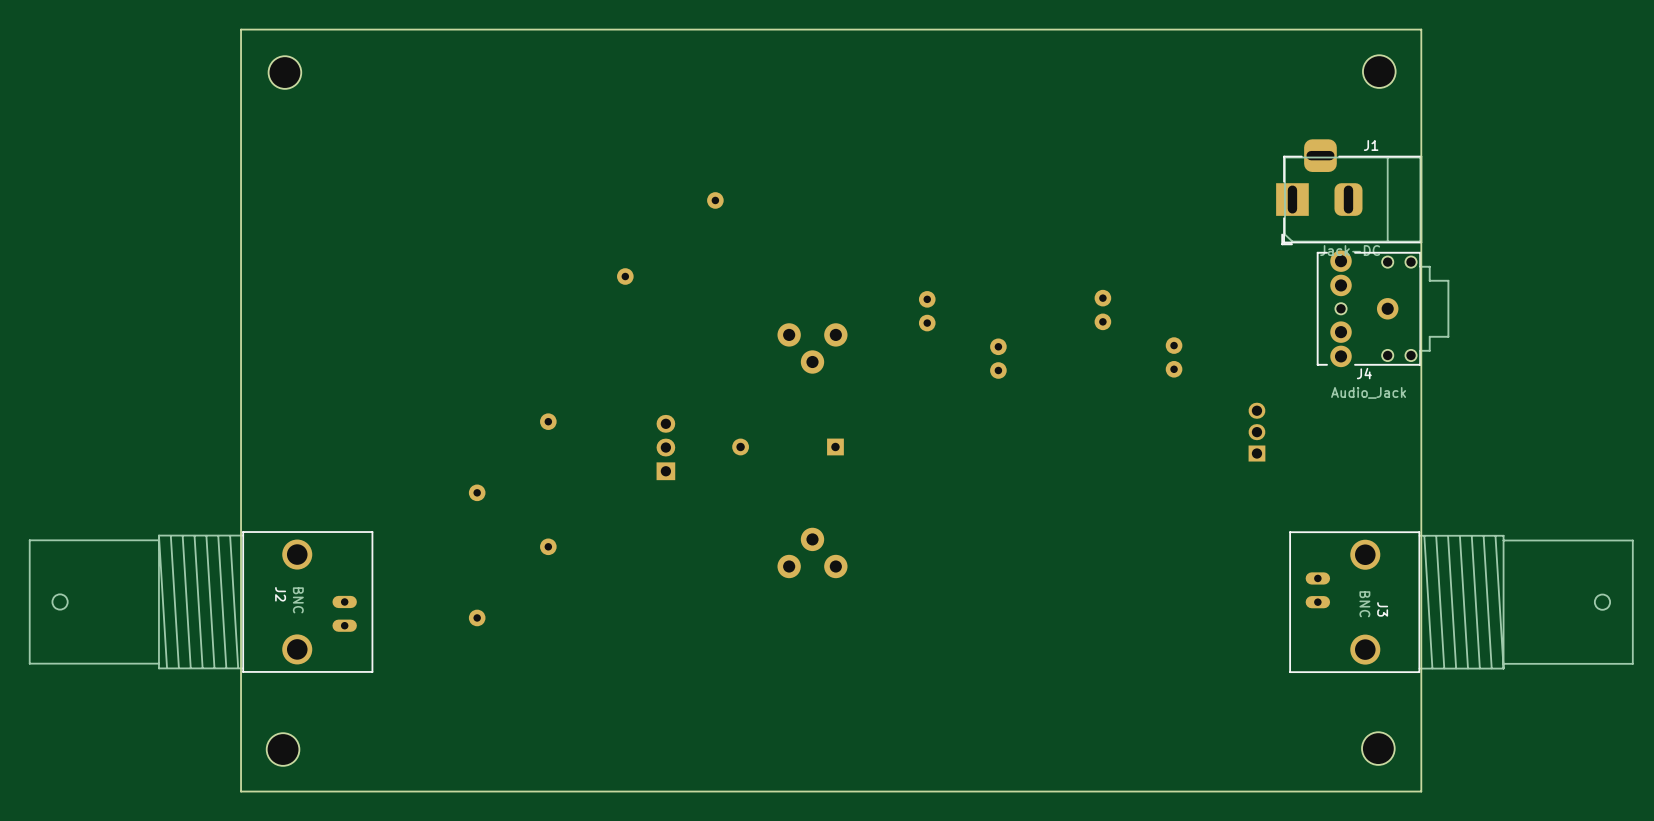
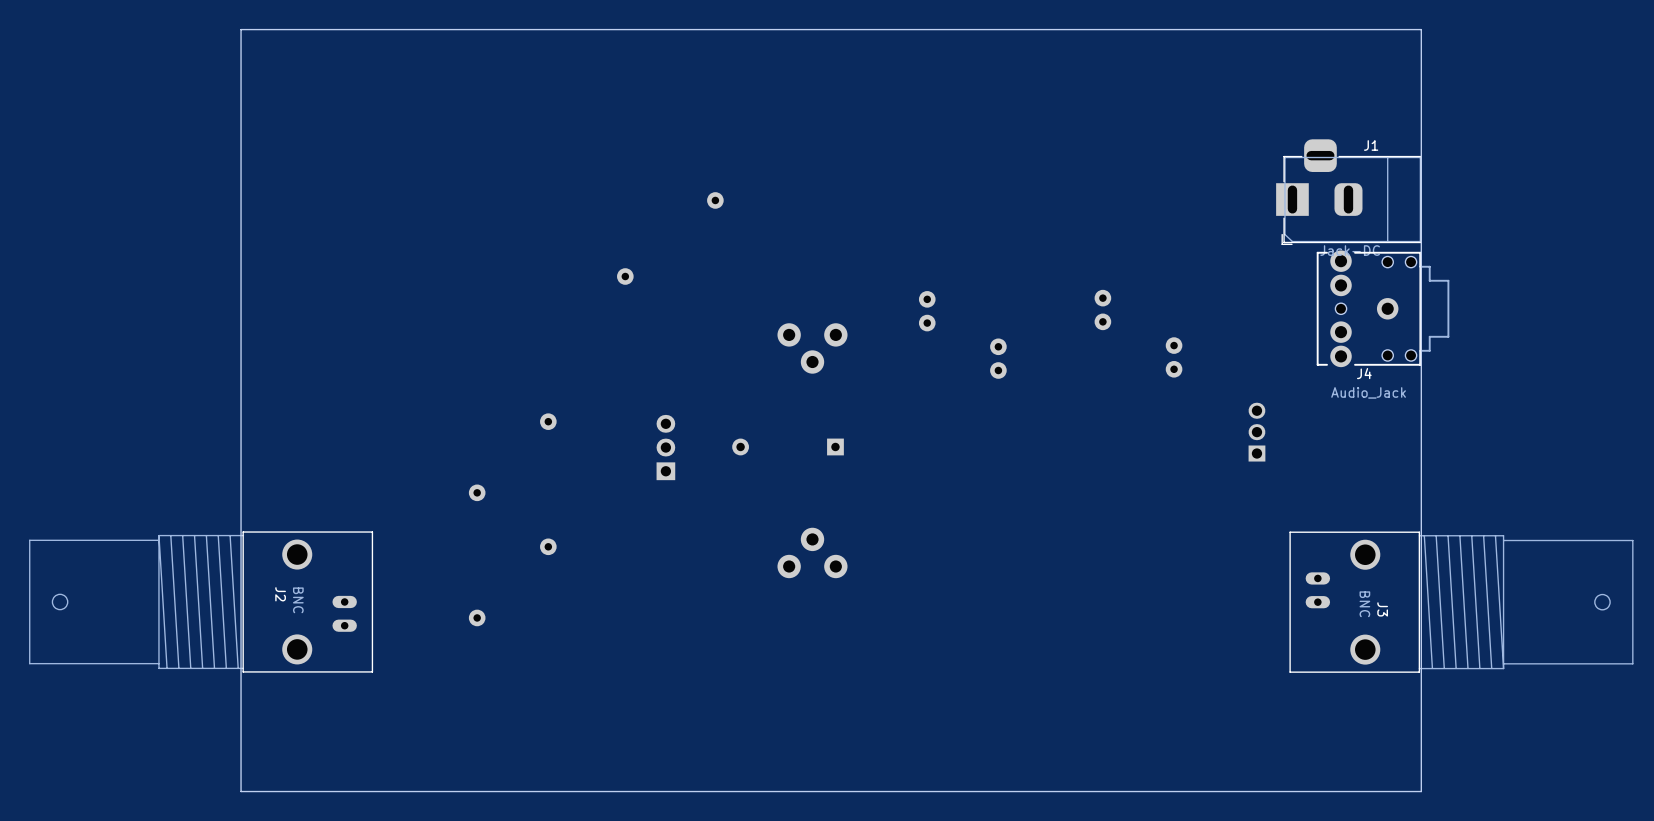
part: (1379, 71) -> none
part: (284, 72) -> none
part: (1378, 748) -> none
part: (283, 749) -> none

